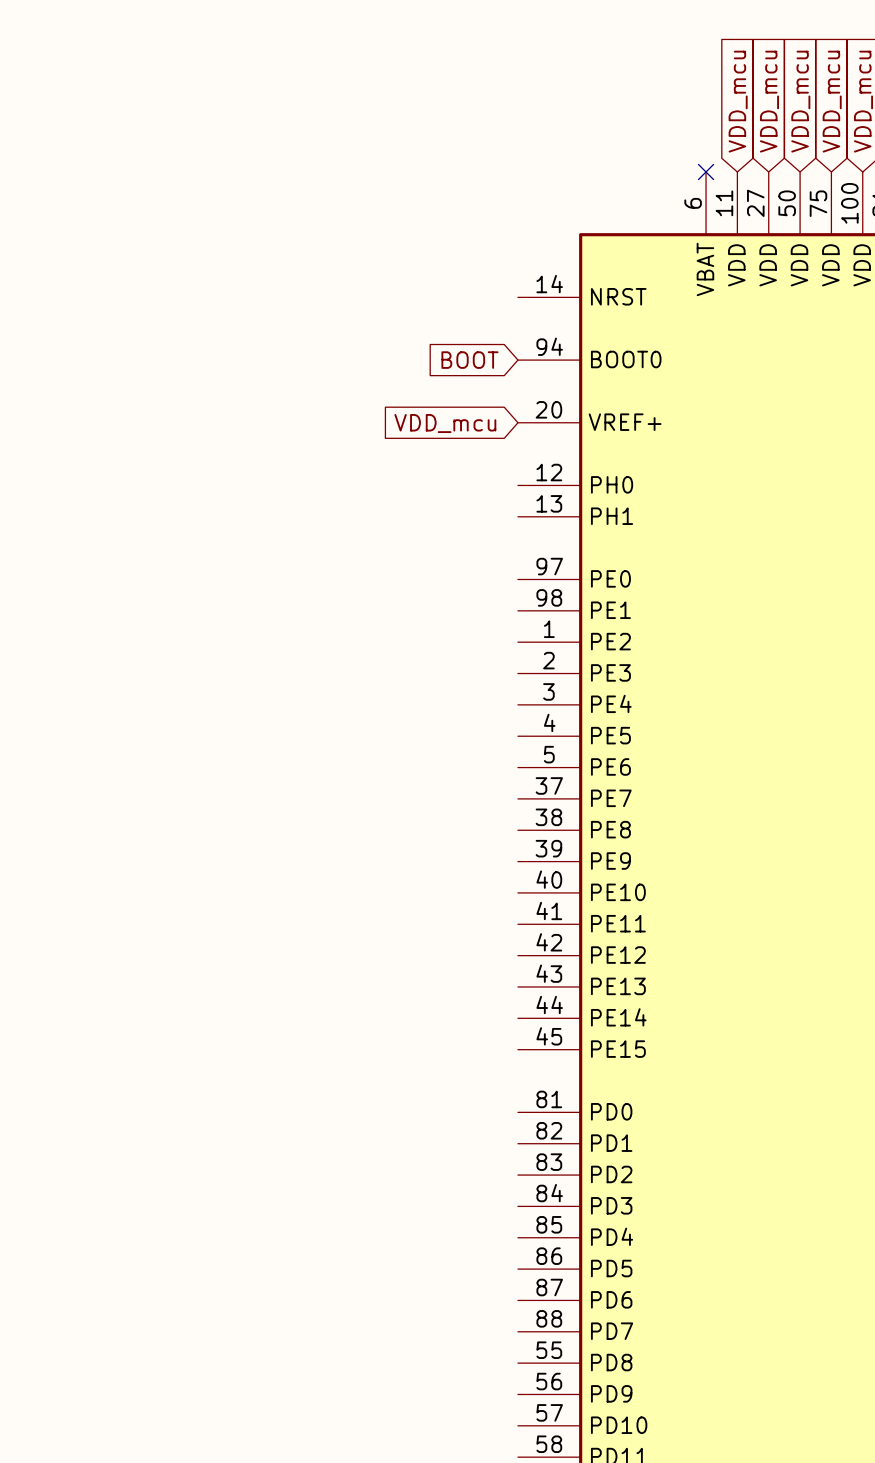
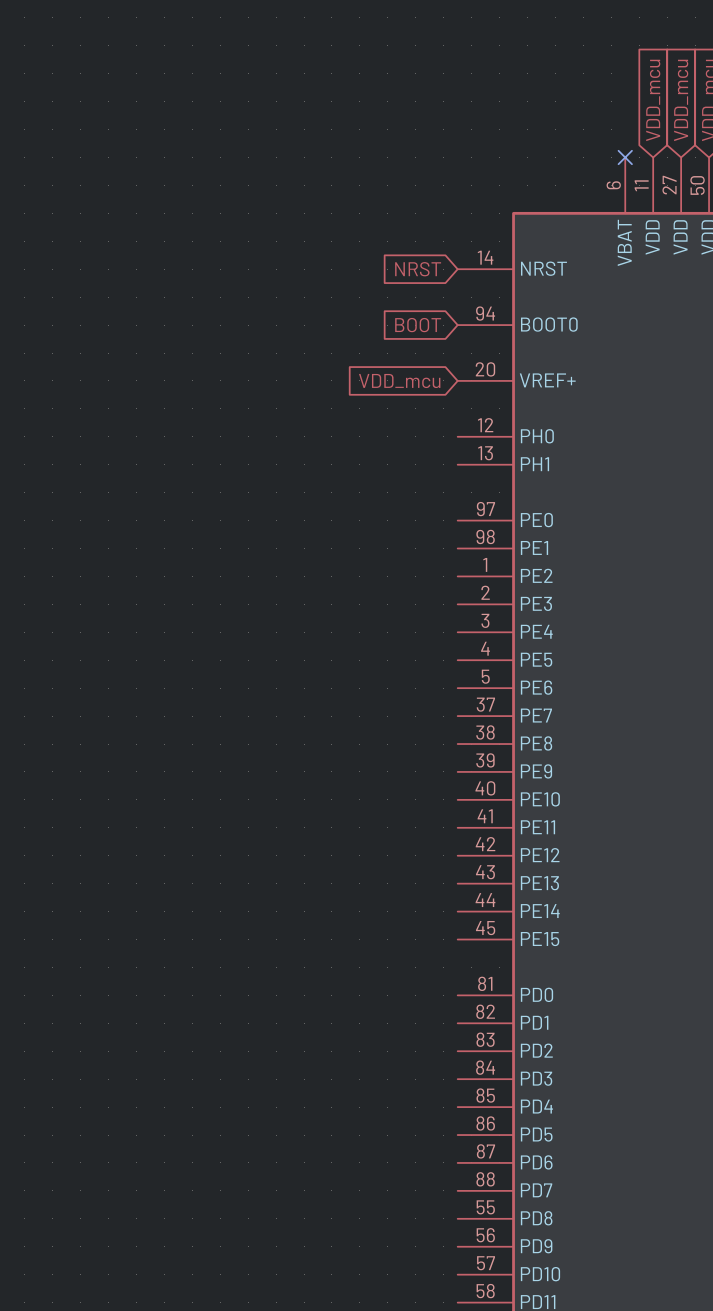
global label: none -> NRST (418, 269)

